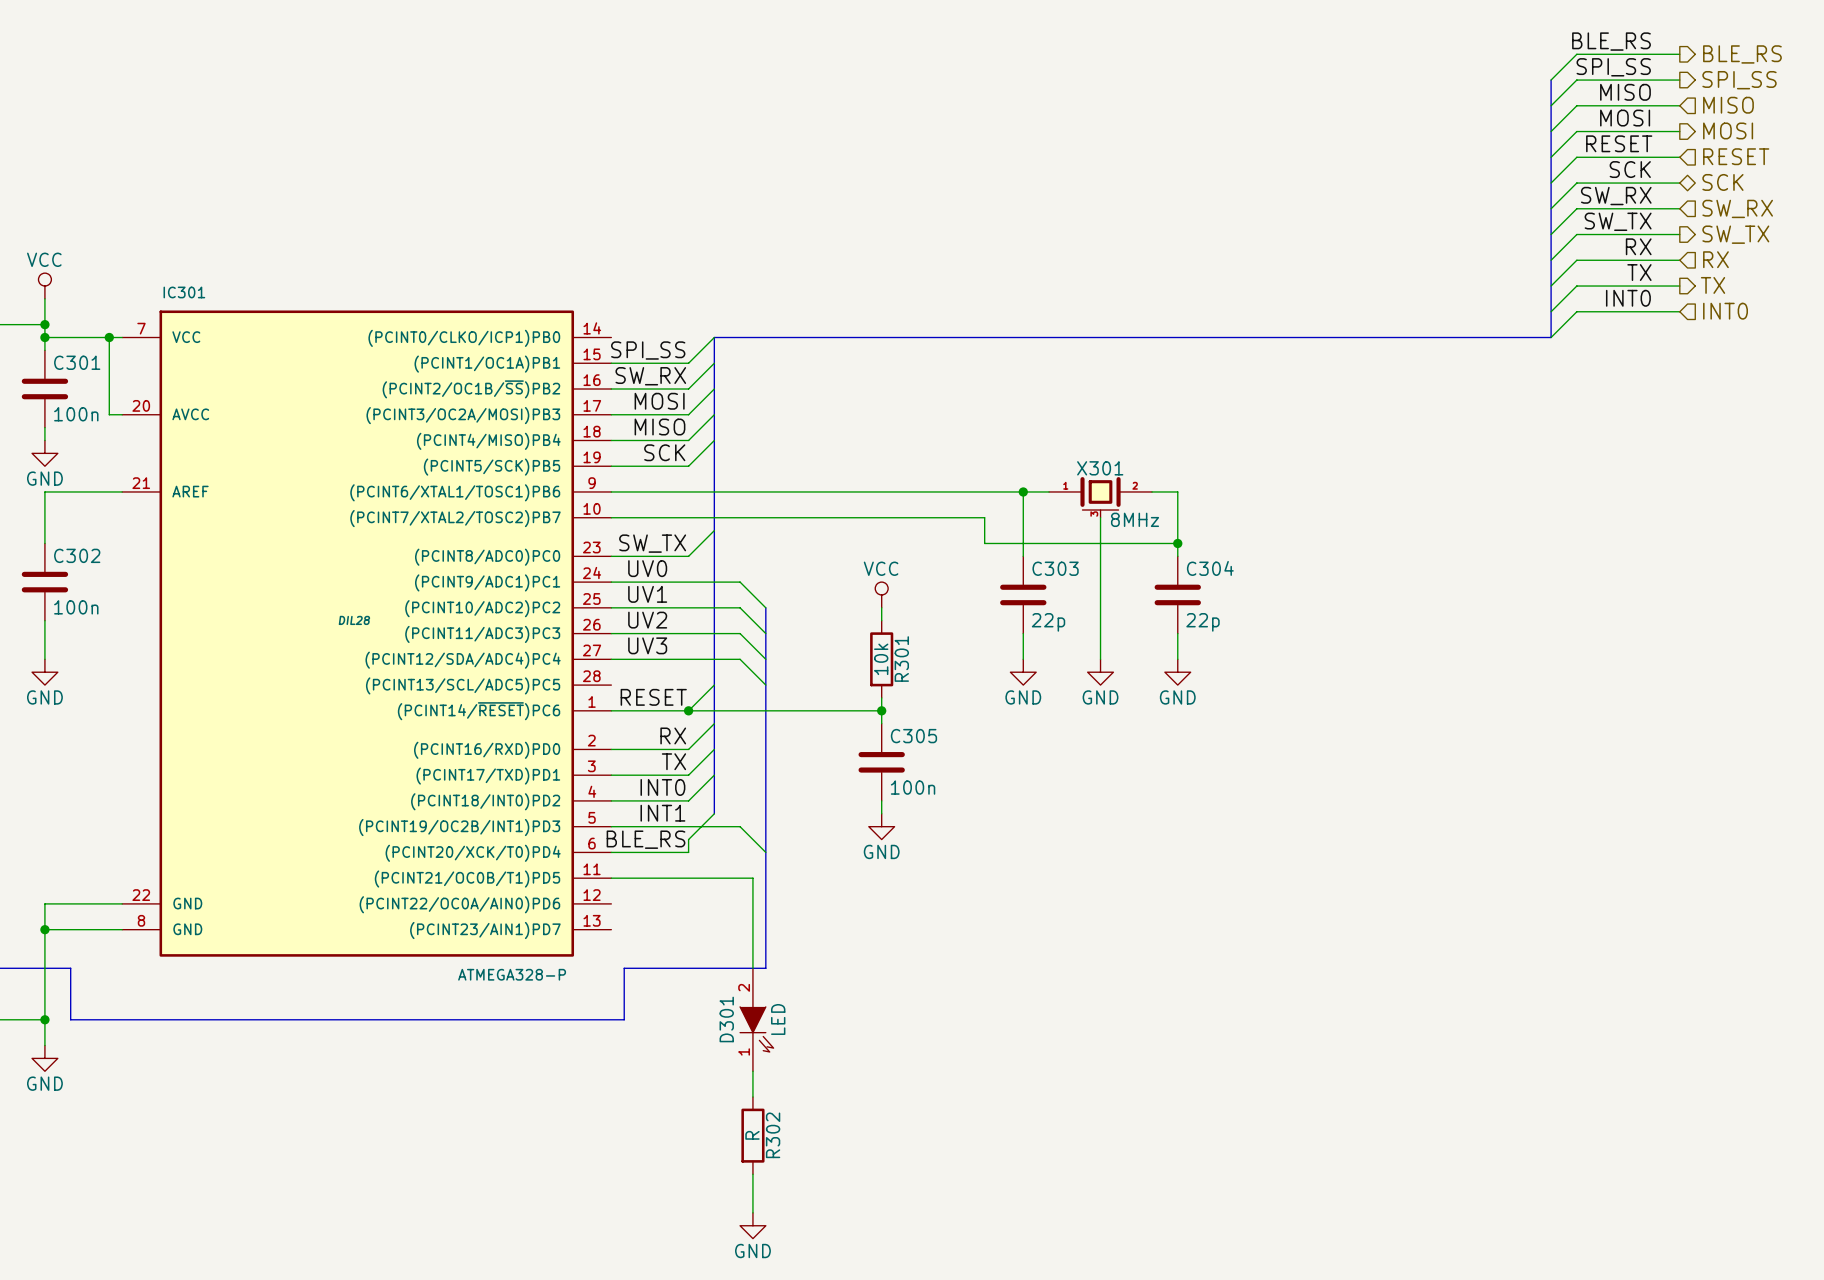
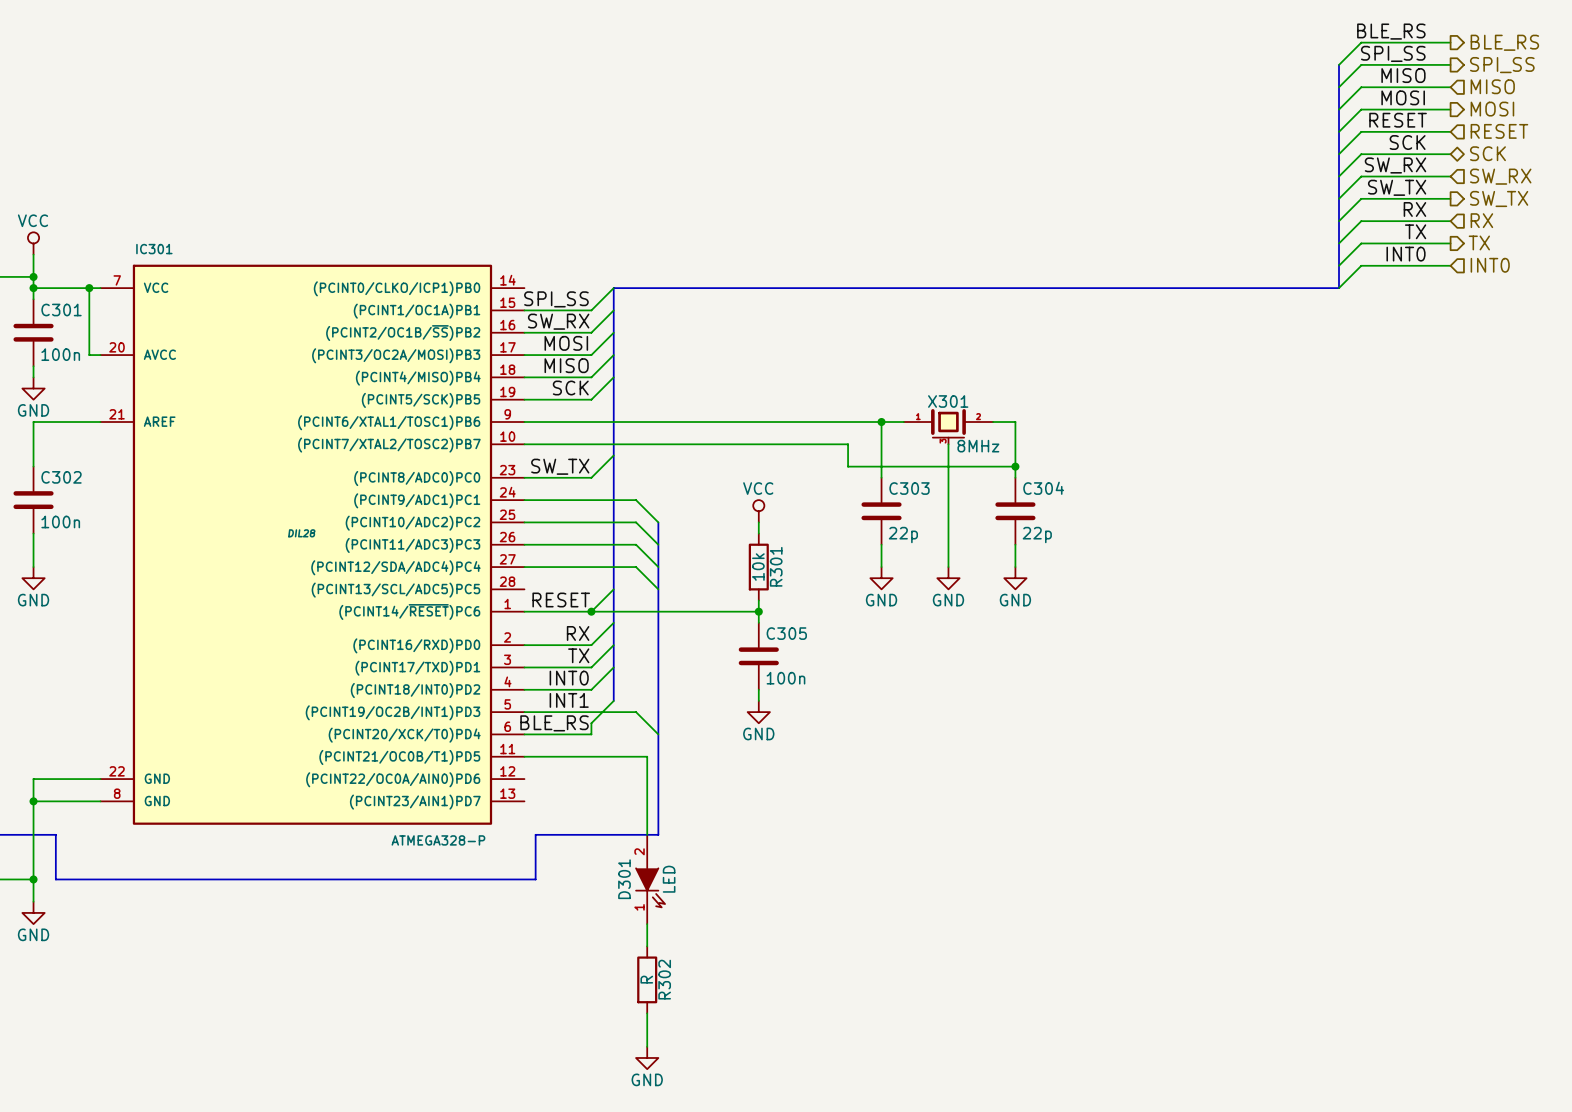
label: UV0 (647, 568) -> none
label: UV1 (647, 594) -> none
label: UV2 (647, 620) -> none
label: UV3 (647, 645) -> none

